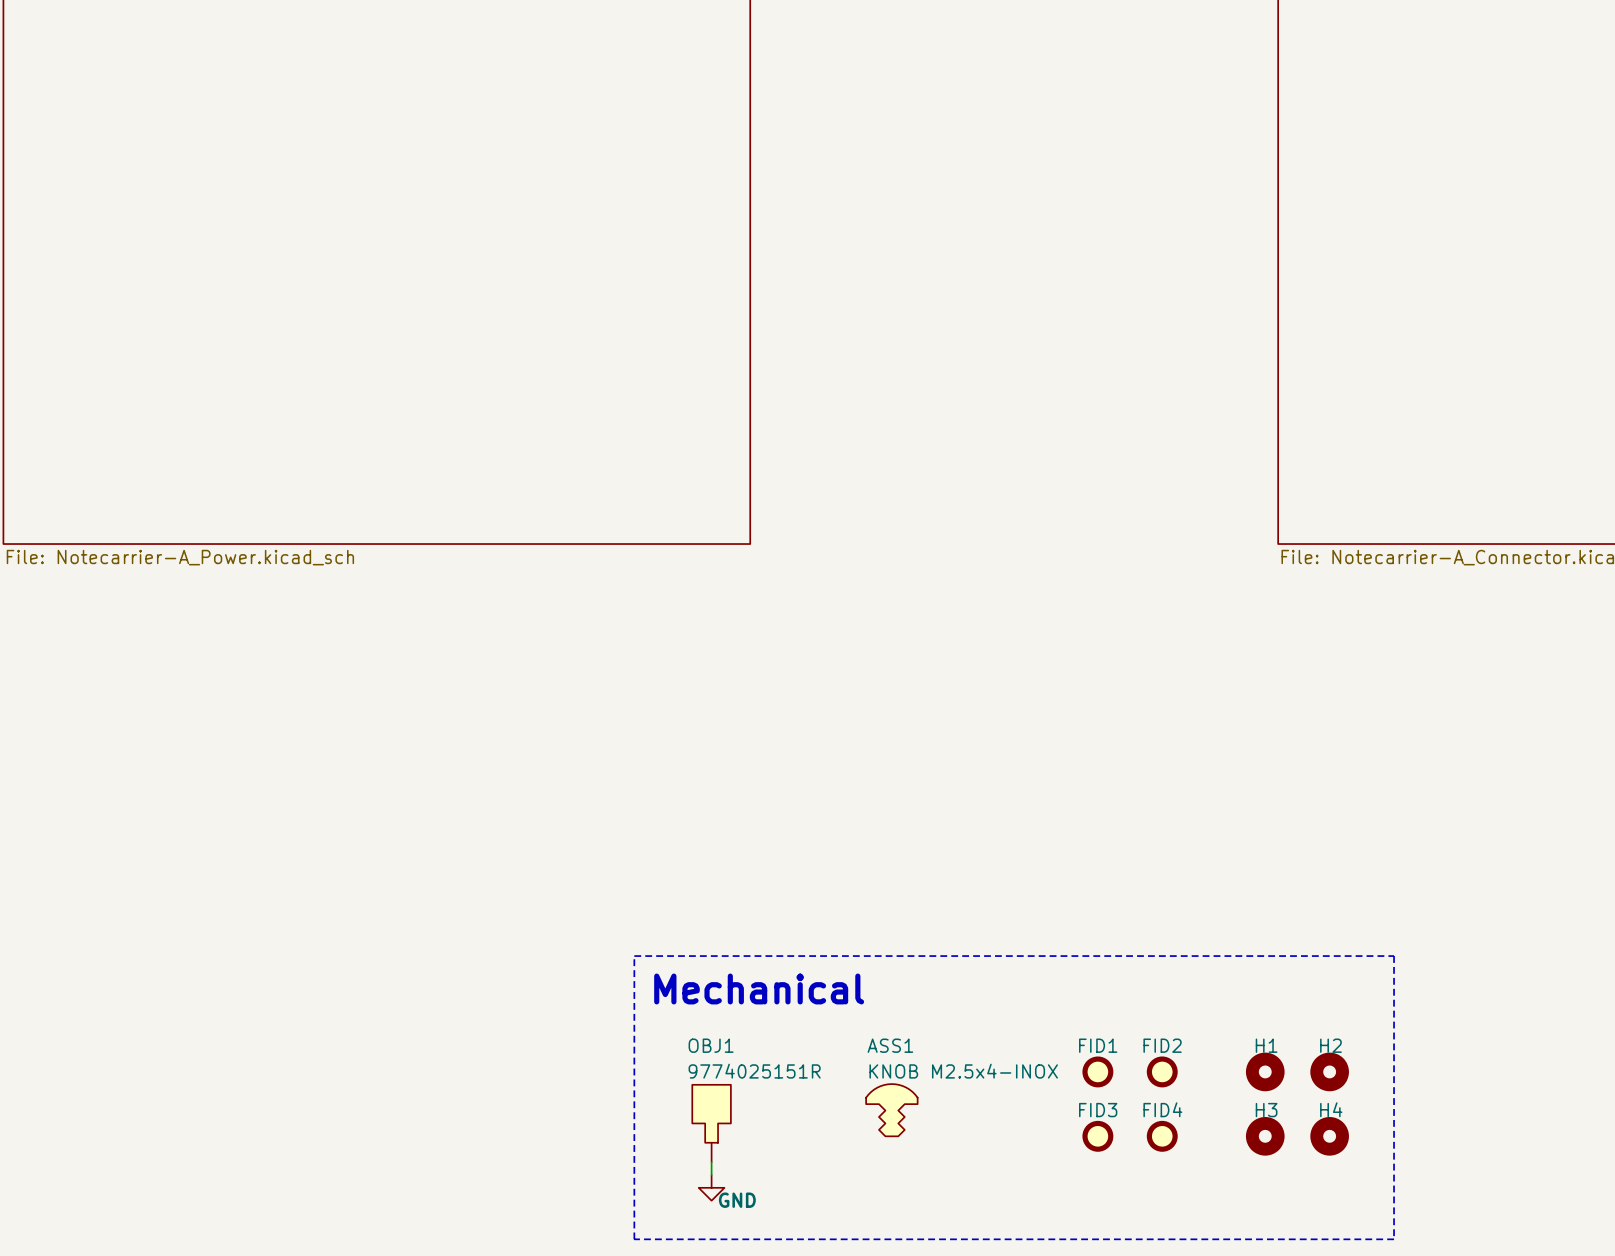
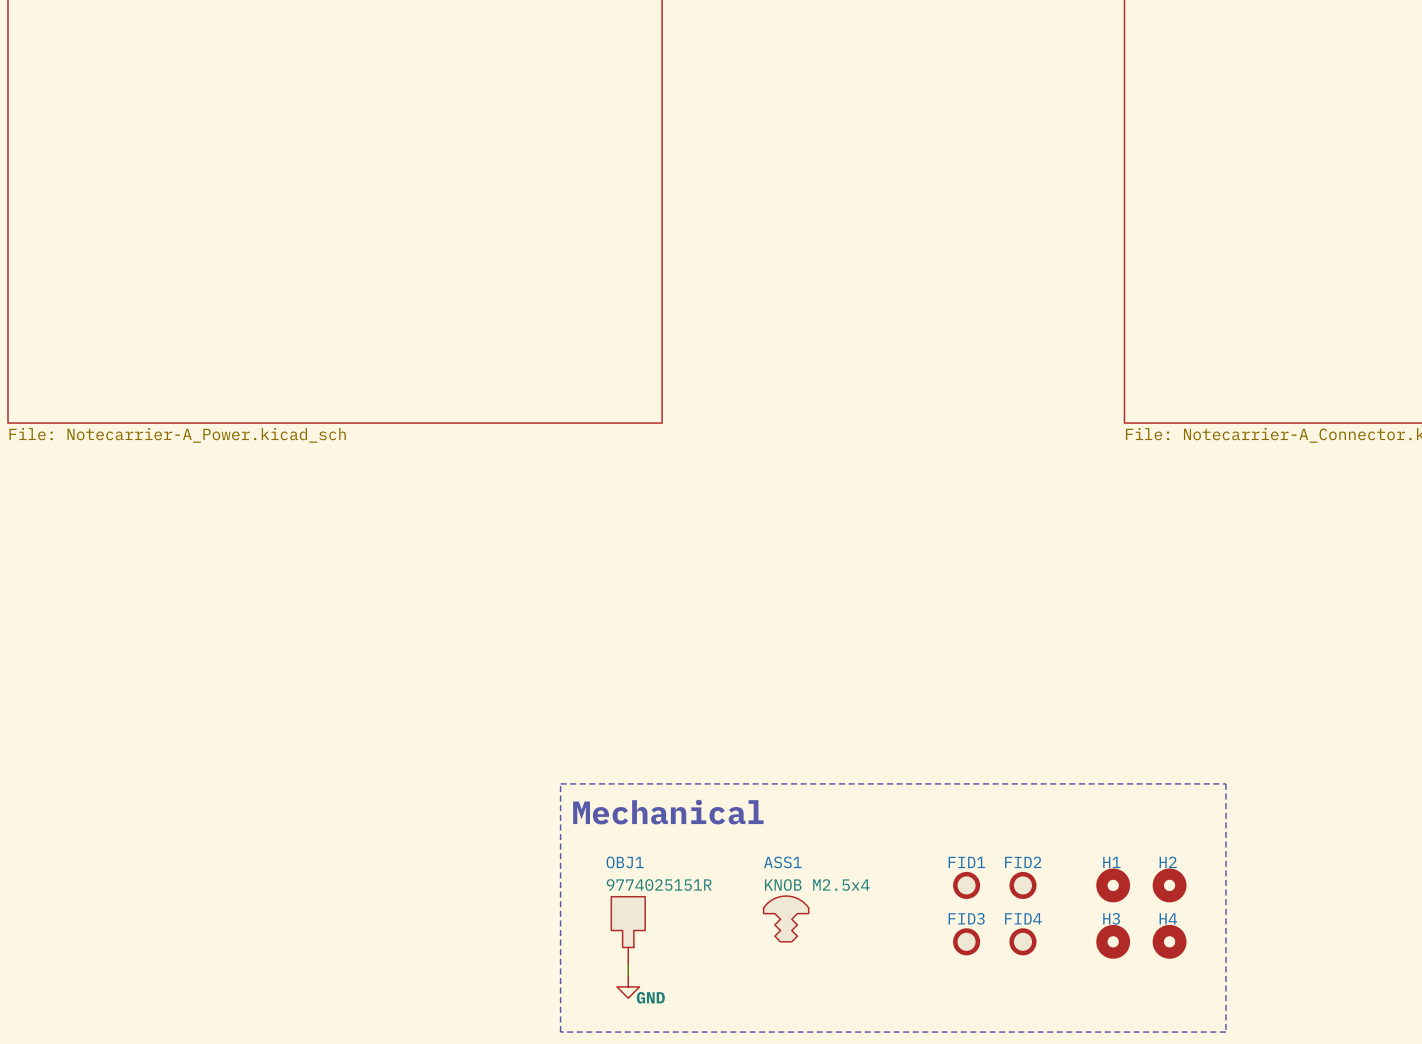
ASS1 value: KNOB M2.5x4-INOX (963, 1071) -> KNOB M2.5x4 (817, 885)

